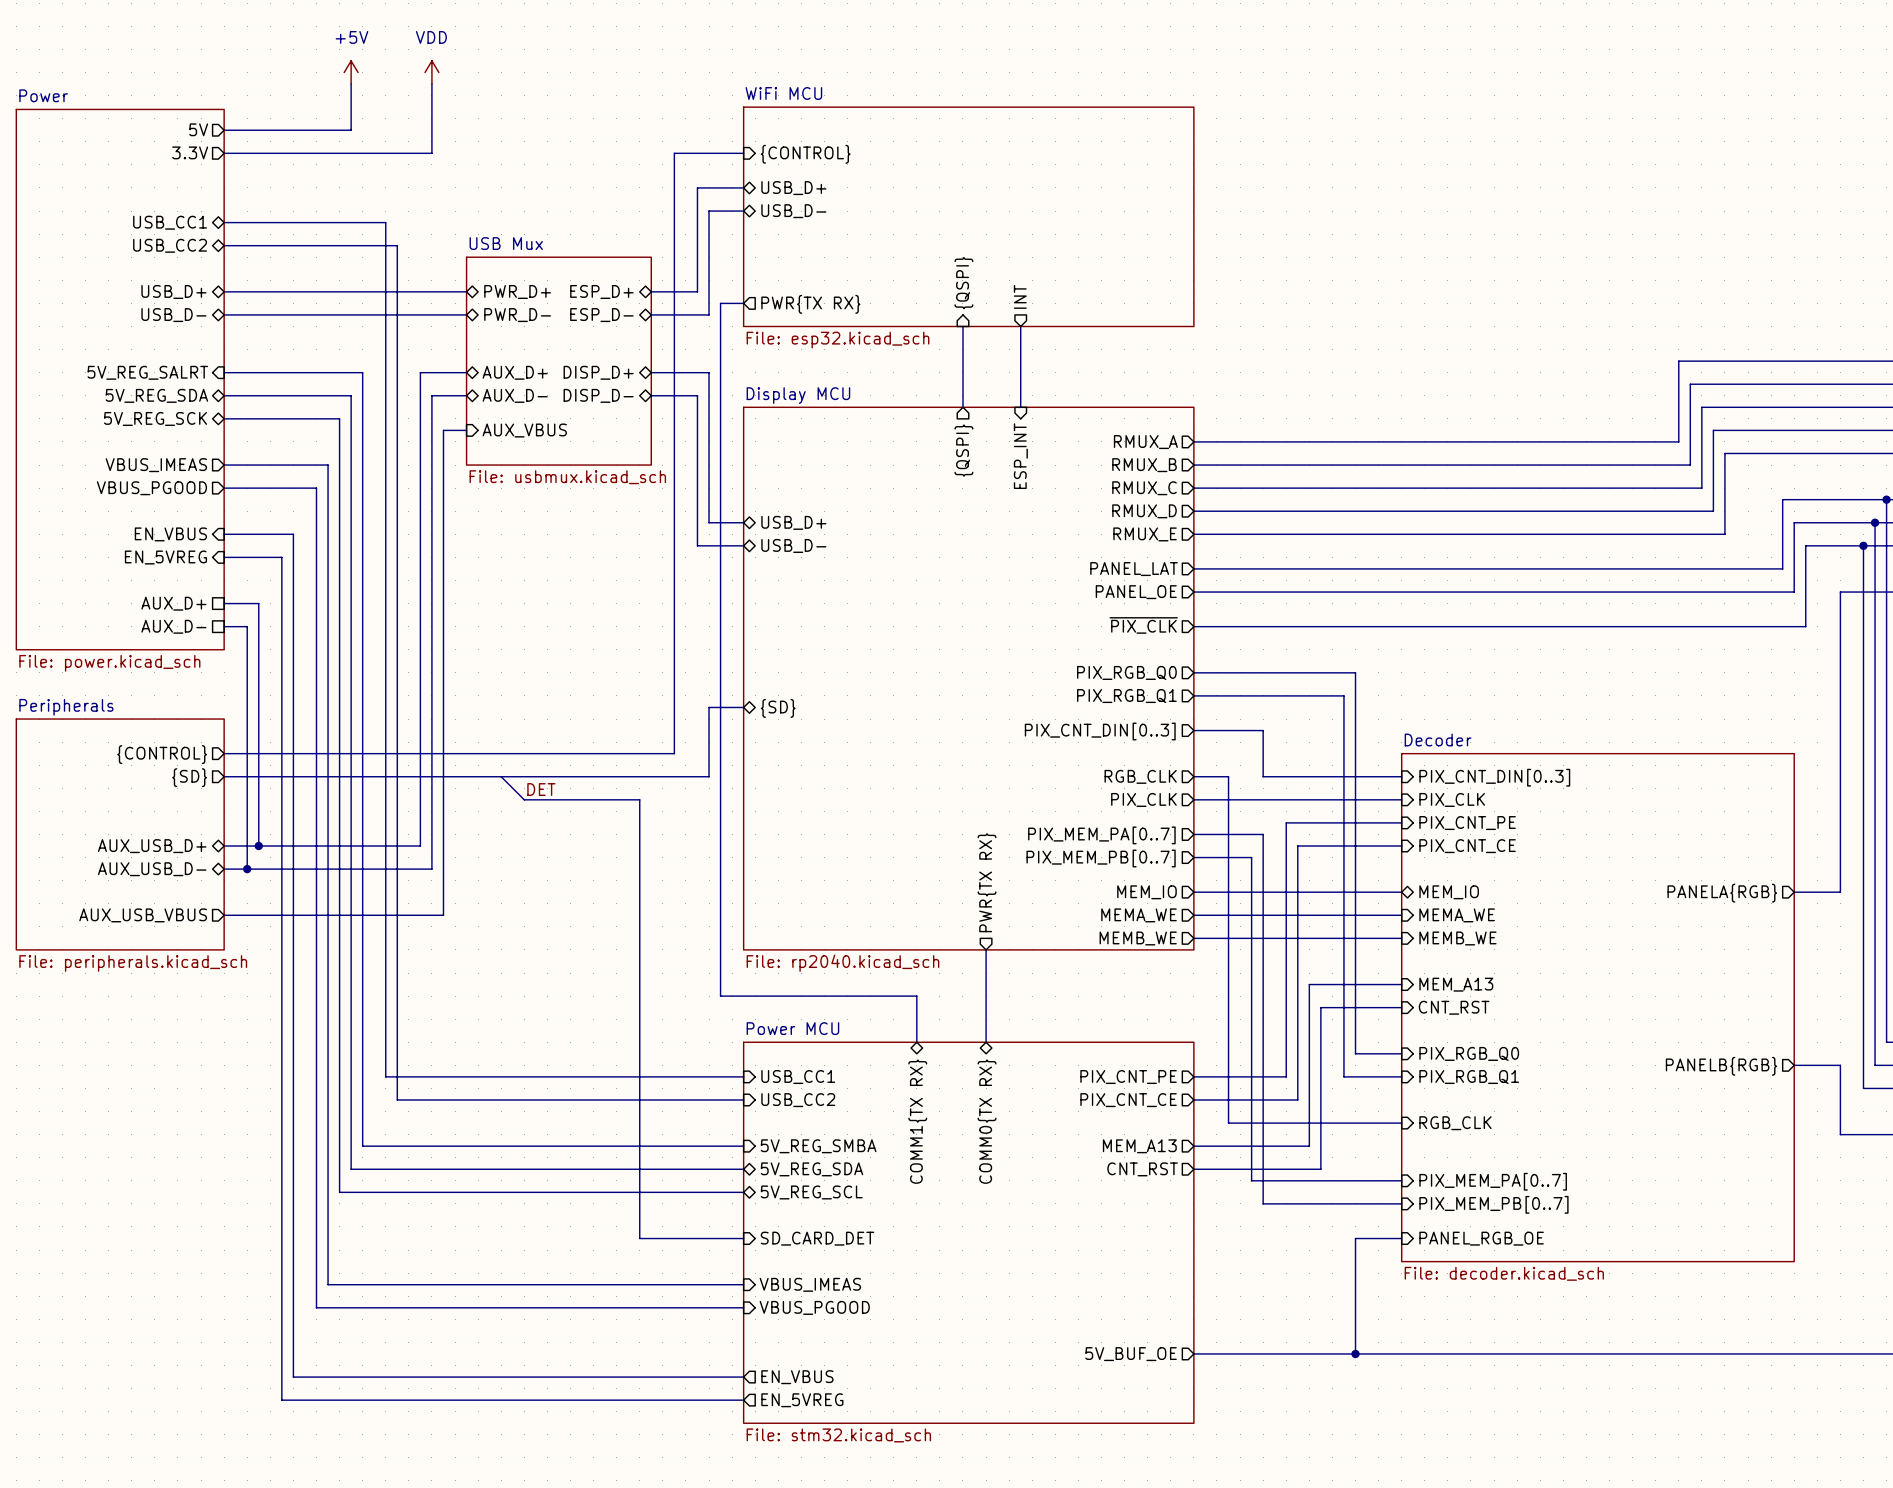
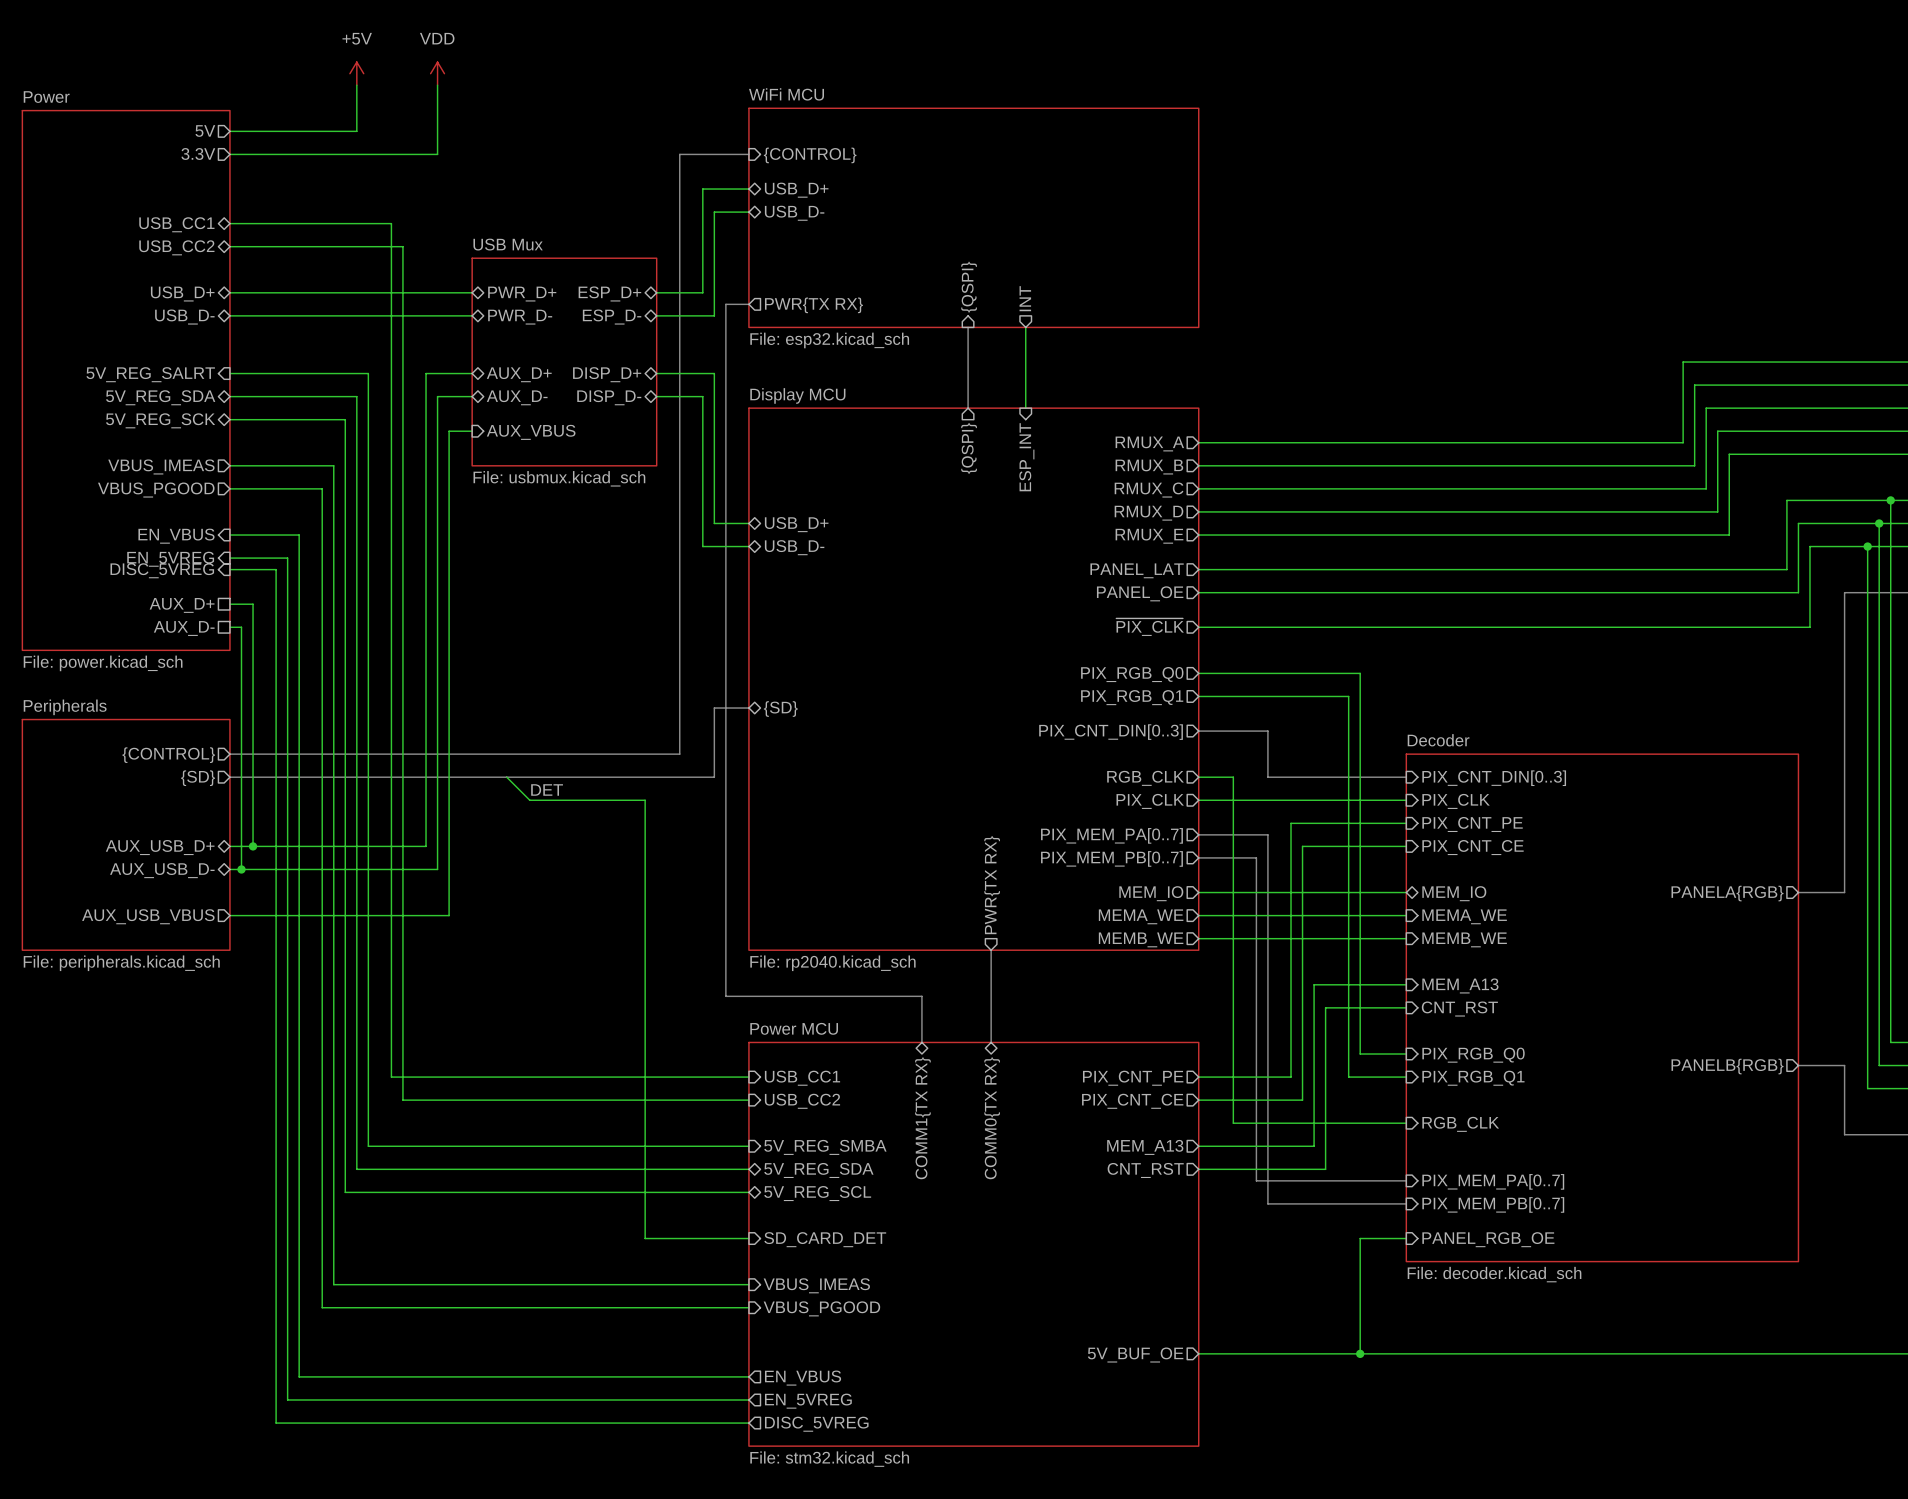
wire: none -> (229, 569) (276, 569) (276, 1423) (748, 1423)
sheet pin: none -> DISC_5VREG (162, 570)
wire: (247, 603) (258, 603) (258, 846) -> none
wire: (235, 626) (247, 626) -> (253, 604) (253, 627)
wire: none -> (241, 627) (241, 869)
wire: (247, 846) (247, 869) -> none
junction: none -> (253, 846)
junction: (258, 846) -> none
junction: none -> (241, 869)
junction: (247, 869) -> none
sheet Power MCU: File: stm32.kicad_sch (968, 1232) -> none
sheet Power MCU: none -> File: stm32.kicad_sch (973, 1244)
sheet pin: none -> DISC_5VREG (816, 1424)

